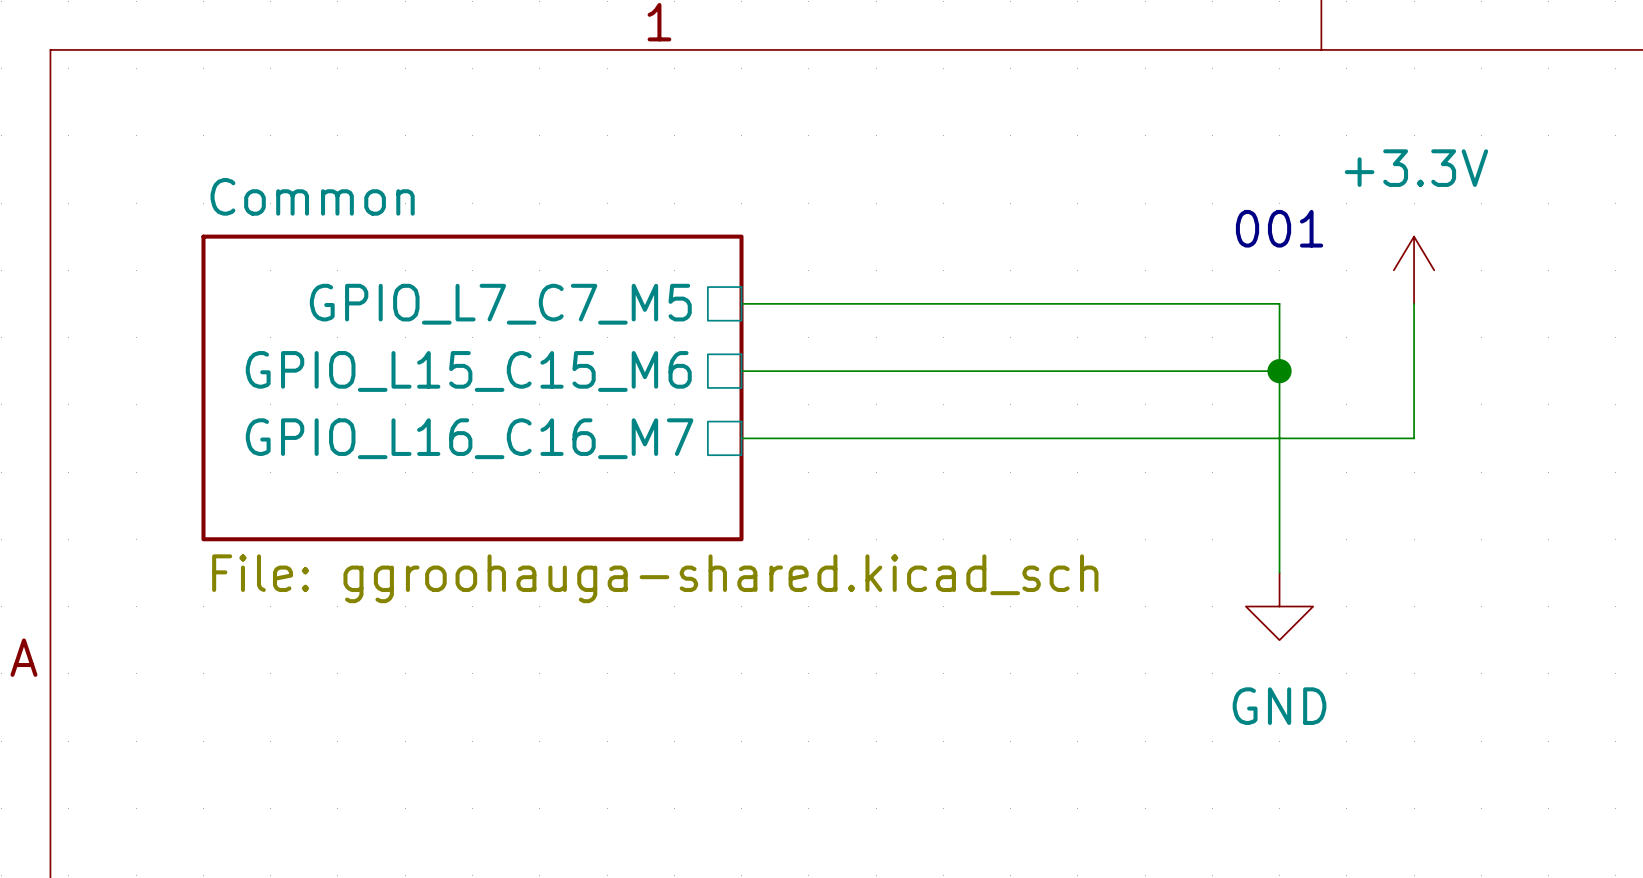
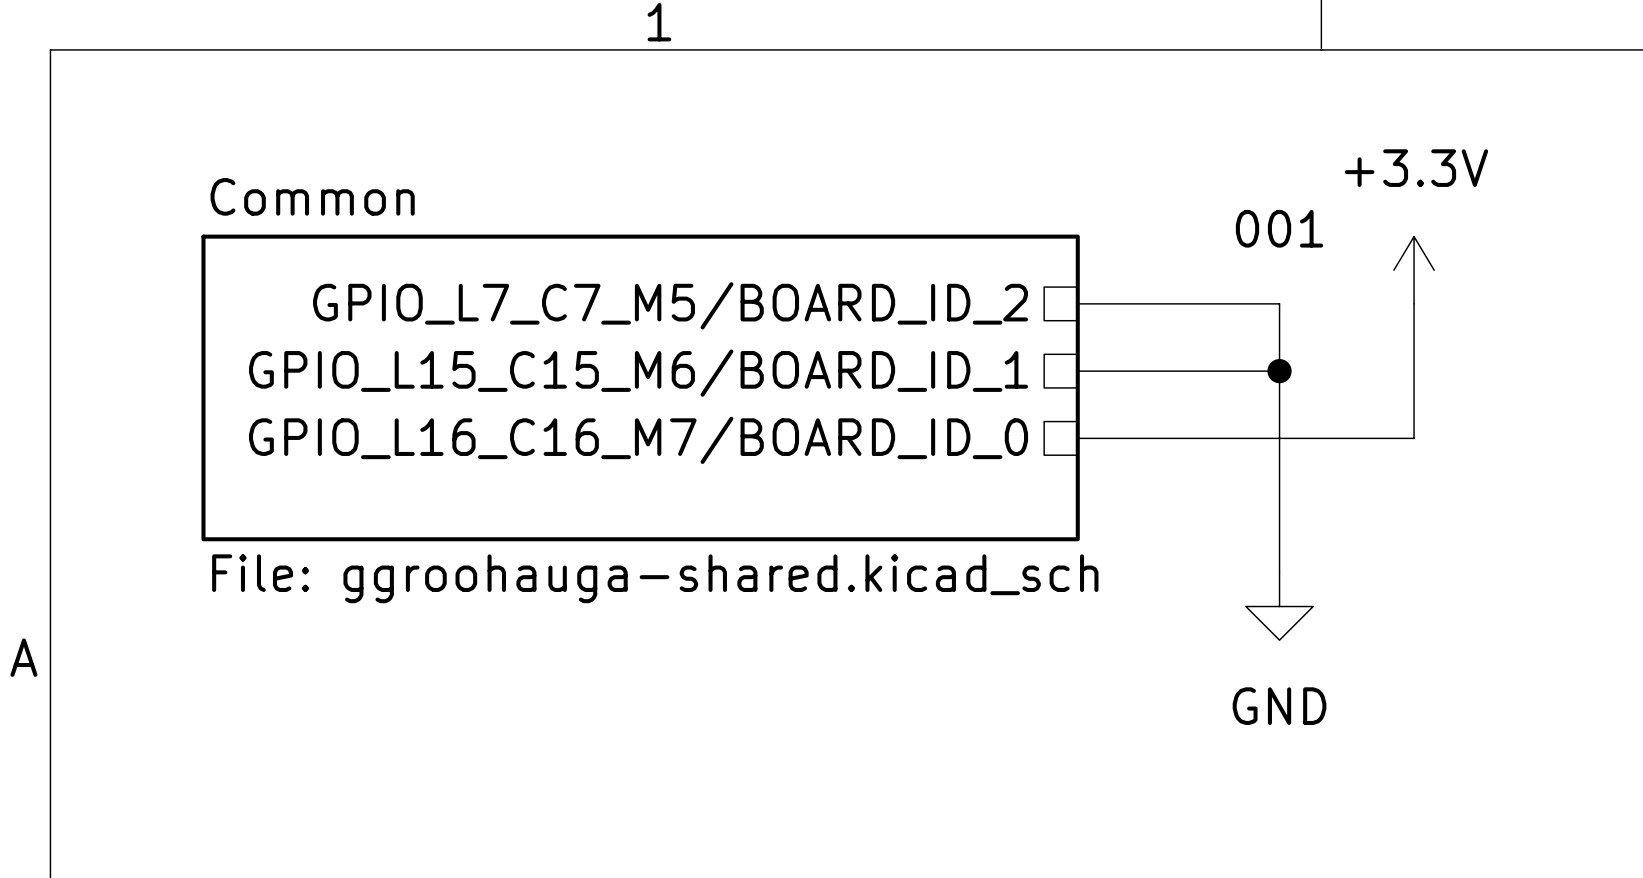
wire: (741, 303) (1077, 303) -> none
sheet pin: GPIO_L7_C7_M5 (500, 304) -> GPIO_L7_C7_M5/BOARD_ID_2 (670, 305)
sheet pin: GPIO_L15_C15_M6 (468, 371) -> GPIO_L15_C15_M6/BOARD_ID_1 (638, 373)
wire: (741, 371) (1077, 371) -> none
sheet Common: File: ggroohauga-shared.kicad_sch (472, 387) -> none
sheet Common: none -> File: ggroohauga-shared.kicad_sch (640, 387)
sheet pin: GPIO_L16_C16_M7 (469, 438) -> GPIO_L16_C16_M7/BOARD_ID_0 (638, 440)
wire: (741, 438) (1077, 438) -> none

